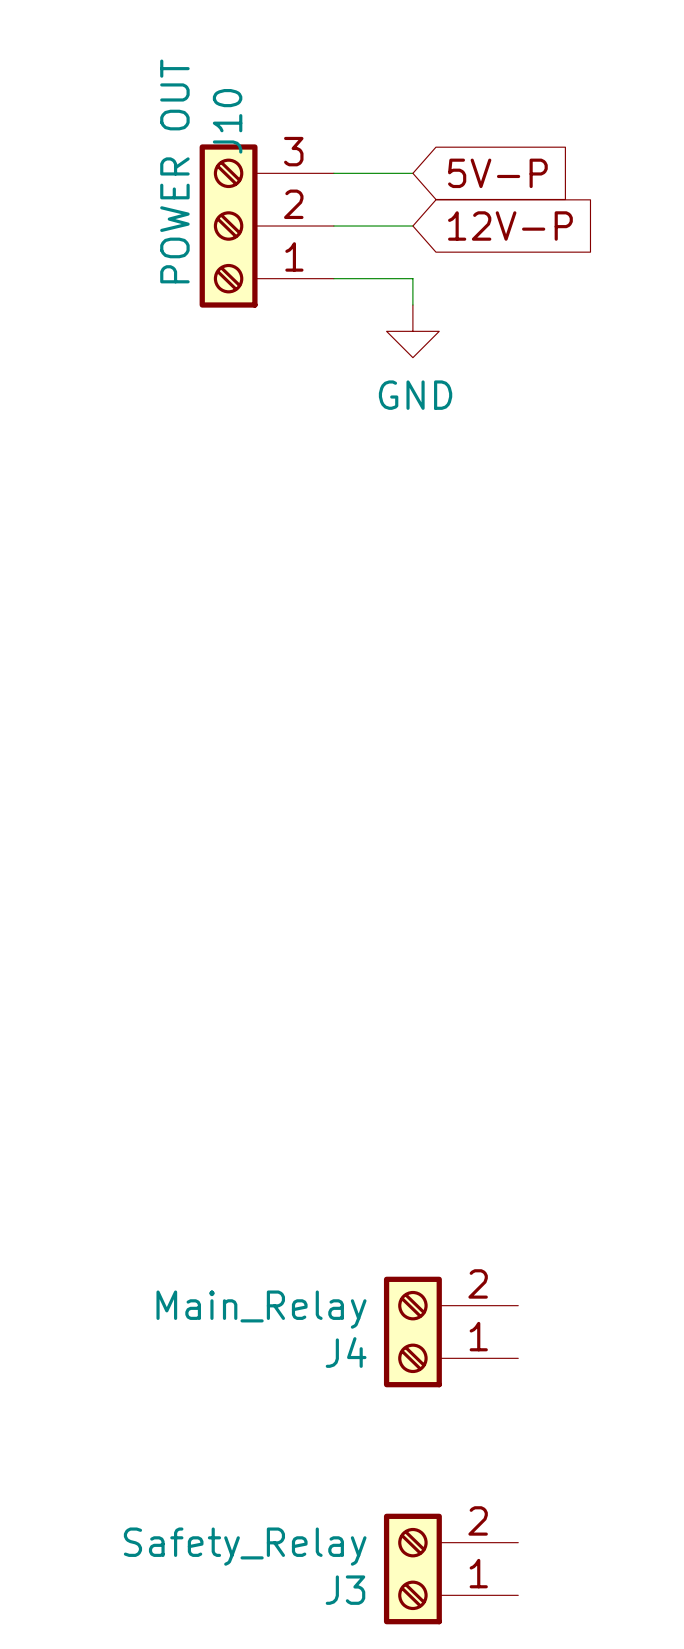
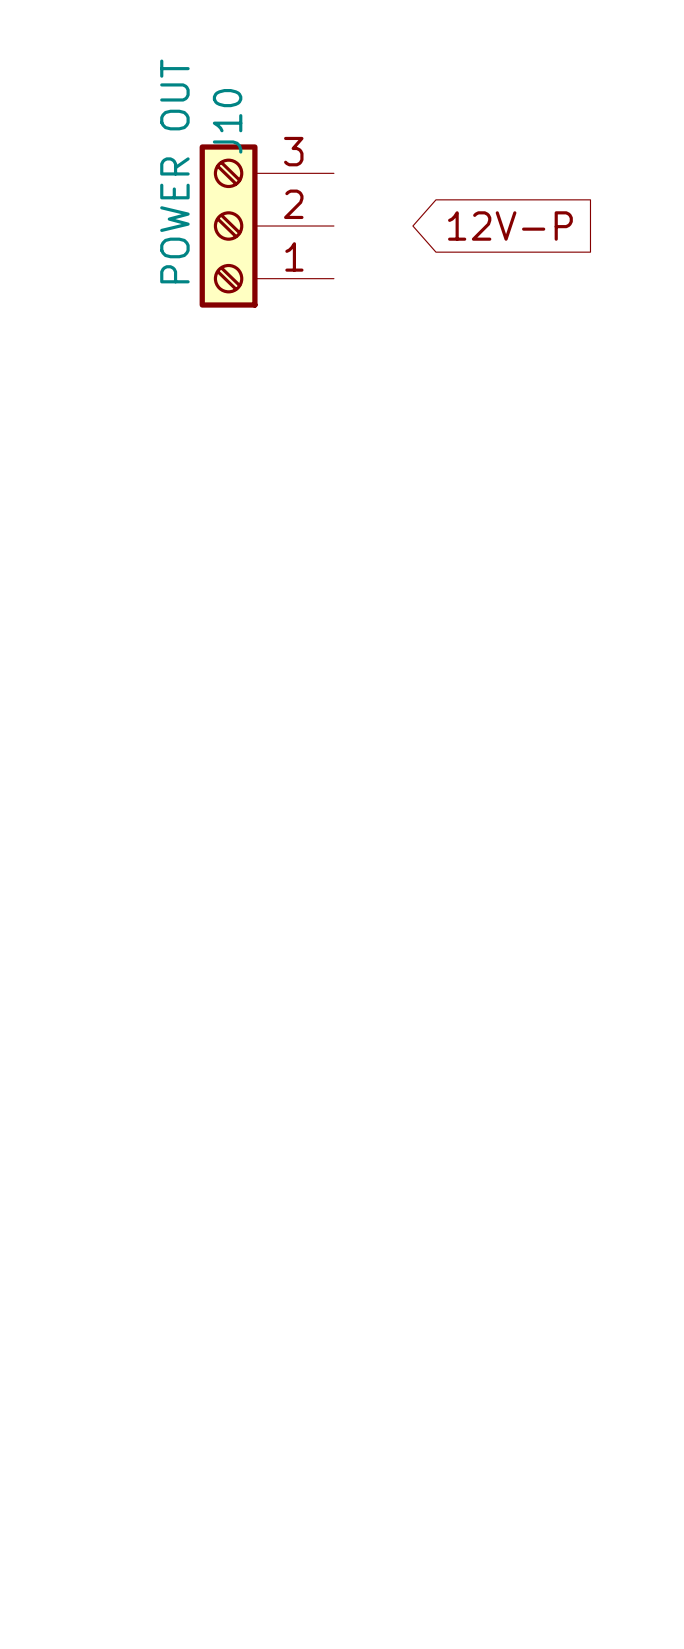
wire: (333, 173) (412, 173) -> none
global label: 5V-P (497, 173) -> none
wire: (333, 226) (412, 226) -> none
wire: (333, 278) (412, 278) (412, 305) -> none
power symbol: GND (412, 331) -> none
J4: Main_Relay (451, 1332) -> none
J3: Safety_Relay (451, 1569) -> none

